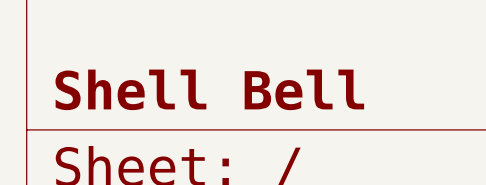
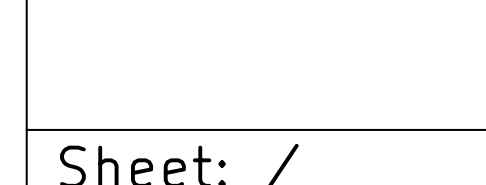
title block: Shell Bell (209, 89) -> none

